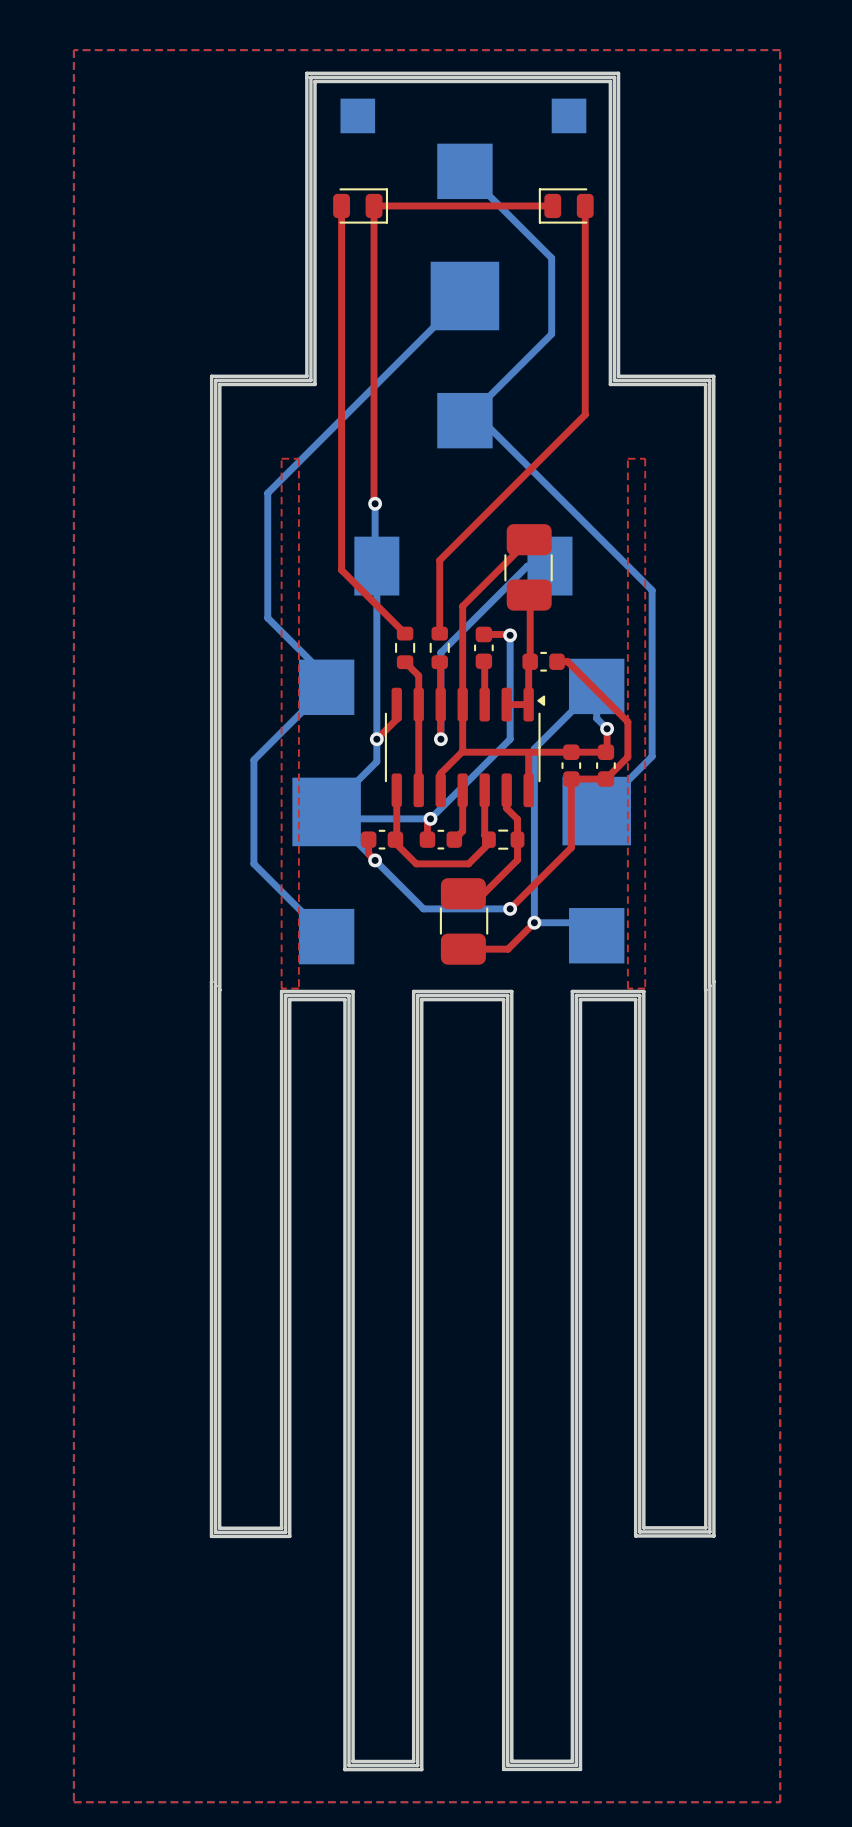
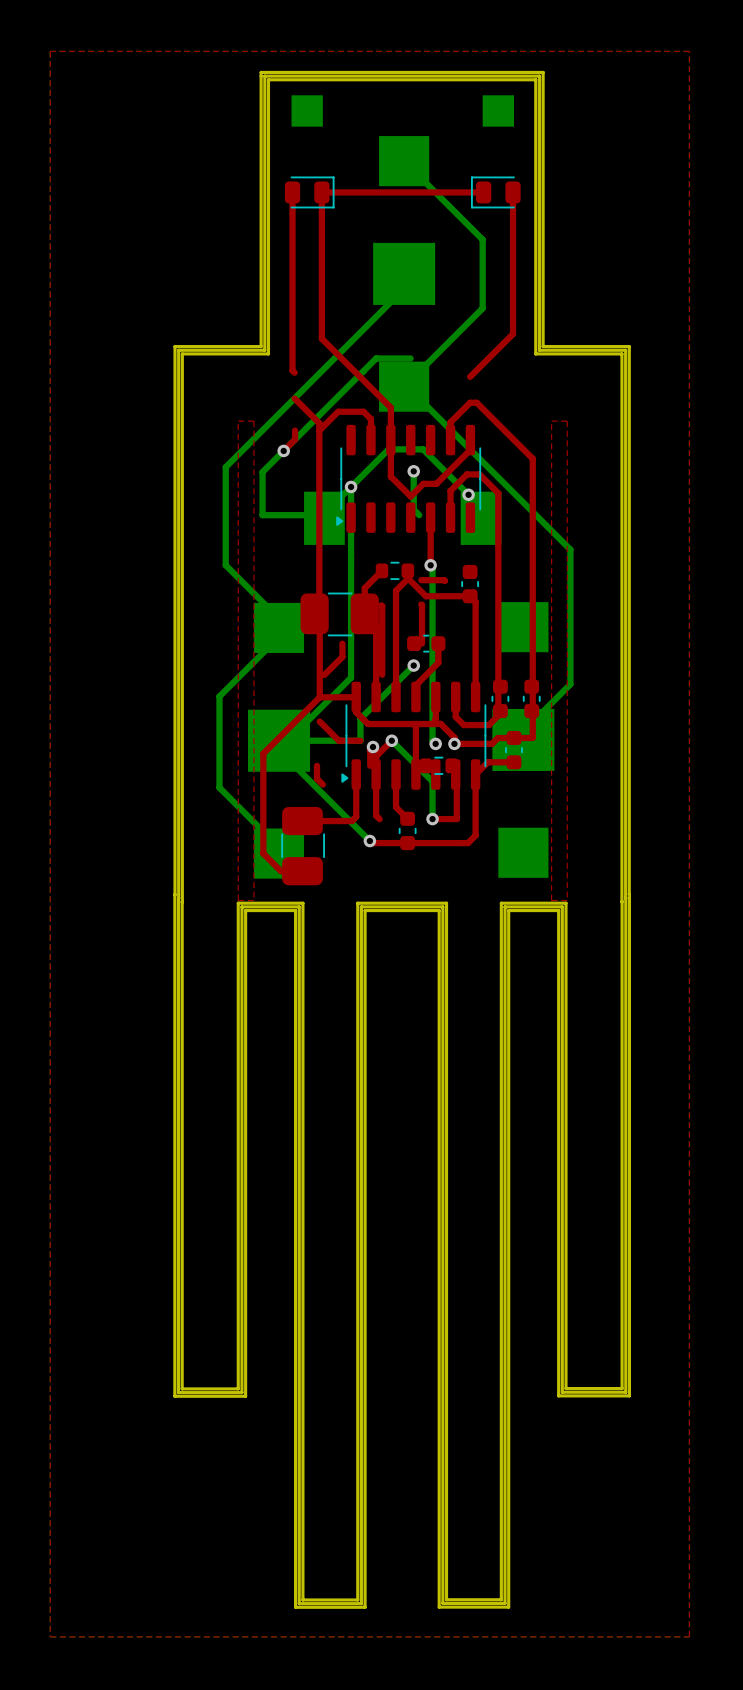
bottom track: (464, 296) (267, 493) (267, 509) -> (404, 288) (225, 467)
top track: (585, 362) (585, 414) (439, 560) (439, 633) -> (513, 334) (470, 376)
top track: (374, 367) (375, 503) -> (321, 338) (390, 407) (390, 476) (410, 496) (423, 483) (436, 483) (470, 449) (470, 440)
bottom track: none -> (410, 358) (376, 358) (262, 472) (262, 515) (322, 515) (388, 449) (423, 449) (468, 494)
top track: (341, 402) (341, 570) (405, 633) -> (292, 370) (294, 372)
bottom track: (464, 420) (482, 420) (652, 590) (652, 756) (596, 811) -> none
top track: none -> (294, 398) (319, 423) (319, 609) (314, 613) (319, 618) (319, 697)
bottom track: none -> (404, 401) (422, 401) (570, 549) (570, 684) (516, 739)
top track: none -> (295, 430) (295, 439) (283, 450)
top track: none -> (319, 430) (338, 411) (363, 411) (370, 419) (370, 440)
top track: none -> (450, 440) (450, 422) (470, 402) (476, 402) (532, 458) (532, 665)
via: none -> (283, 450)
bottom track: (375, 503) (376, 761) (326, 811) (423, 908) (510, 908) -> none
via: (375, 503) -> none
bottom track: none -> (413, 471) (413, 509) (419, 515)
via: none -> (413, 471)
part: none -> (408, 478)
bottom track: none -> (351, 486) (351, 677) (288, 740)
via: none -> (351, 486)
top track: (529, 539) (462, 606) (462, 751) (440, 773) (440, 790) -> none
via: none -> (468, 494)
top track: none -> (430, 517) (430, 565)
top track: none -> (450, 517) (450, 490) (467, 474) (479, 474) (498, 493) (498, 715) (488, 725) (463, 725) (455, 716) (455, 697)
bottom track: (549, 566) (527, 566) (440, 652) (440, 739) -> none
part rotation: 0° (528, 567) -> 90° counterclockwise (339, 614)
part position: (528, 567) -> (339, 614)
top track: (529, 595) (528, 704) (506, 704) -> none
bottom track: none -> (430, 565) (432, 567) (432, 740) (435, 743)
top track: none -> (382, 570) (364, 588) (364, 613) (376, 625) (376, 697)
part: none -> (394, 570)
top track: none -> (407, 570) (407, 578) (396, 590) (396, 697)
top track: none -> (407, 578) (425, 596) (470, 596) (475, 601) (475, 697)
bottom track: (510, 635) (510, 739) (430, 818) (333, 818) -> none
via position: (510, 635) -> (430, 565)
part: (405, 647) -> none
part: (439, 647) -> none
part: (483, 647) -> none
part rotation: 0° (543, 661) -> 90° clockwise (470, 584)
top track: (557, 661) (567, 661) (627, 721) (627, 757) (605, 779) (571, 779) (571, 847) (510, 908) -> none
top track: (405, 662) (418, 675) (418, 790) -> none
bottom track: (326, 687) (253, 760) (253, 863) (326, 936) -> none
bottom track: none -> (288, 627) (219, 696) (219, 787) (285, 853) (288, 853)
part: none -> (426, 643)
top track: none -> (438, 643) (438, 662) (415, 685) (415, 697)
bottom track: none -> (413, 665) (360, 718) (360, 740) (288, 740)
bottom track: (607, 728) (596, 718) (596, 686) (534, 748) (534, 922) (583, 922) (596, 935) -> none
via: (607, 728) -> none
via: (376, 739) -> none
via position: (440, 739) -> (413, 665)
part rotation: 0° (465, 747) -> 180° (413, 735)
top track: (607, 751) (461, 752) -> (532, 685) (532, 737) (497, 738) (492, 743) (454, 743) (454, 737) (440, 723) (435, 723) (435, 697)
top track: (530, 752) (528, 754) (528, 790) -> none
top track: none -> (319, 697) (356, 697) (356, 712) (367, 724) (435, 724)
top track: none -> (319, 697) (263, 753) (263, 853) (280, 871) (302, 871)
top track: none -> (319, 721) (338, 740) (360, 740)
top track: (396, 790) (395, 843) (416, 863) (468, 863) (488, 843) (488, 839) (484, 835) (484, 790) -> none
top track: (462, 790) (462, 831) (454, 839) -> none
top track: (506, 790) (506, 808) (517, 819) (517, 859) (483, 893) (463, 893) -> none
top track: none -> (413, 724) (415, 726) (415, 774)
bottom track: none -> (288, 740) (288, 759) (369, 841)
bottom track: none -> (391, 740) (432, 781) (432, 819)
top track: none -> (391, 740) (376, 756) (376, 815) (379, 819)
via: none -> (391, 740)
via: none -> (435, 743)
via: none -> (454, 743)
part: none -> (513, 750)
top track: none -> (513, 762) (487, 762) (475, 774) (475, 835) (468, 843) (371, 843) (369, 841)
part: (382, 839) -> none
part: (440, 839) -> none
top track: none -> (356, 774) (356, 816) (351, 821) (302, 821)
top track: none -> (396, 774) (396, 807) (407, 818)
top track: none -> (455, 774) (456, 818) (432, 819)
via: (375, 860) -> none
part footprint: [439, 878, 489, 965] -> [398, 811, 417, 851]
via position: (510, 908) -> (432, 819)
via: none -> (369, 841)
top track: (534, 922) (507, 949) (463, 949) -> none
via: (534, 922) -> none
part: none -> (303, 846)

